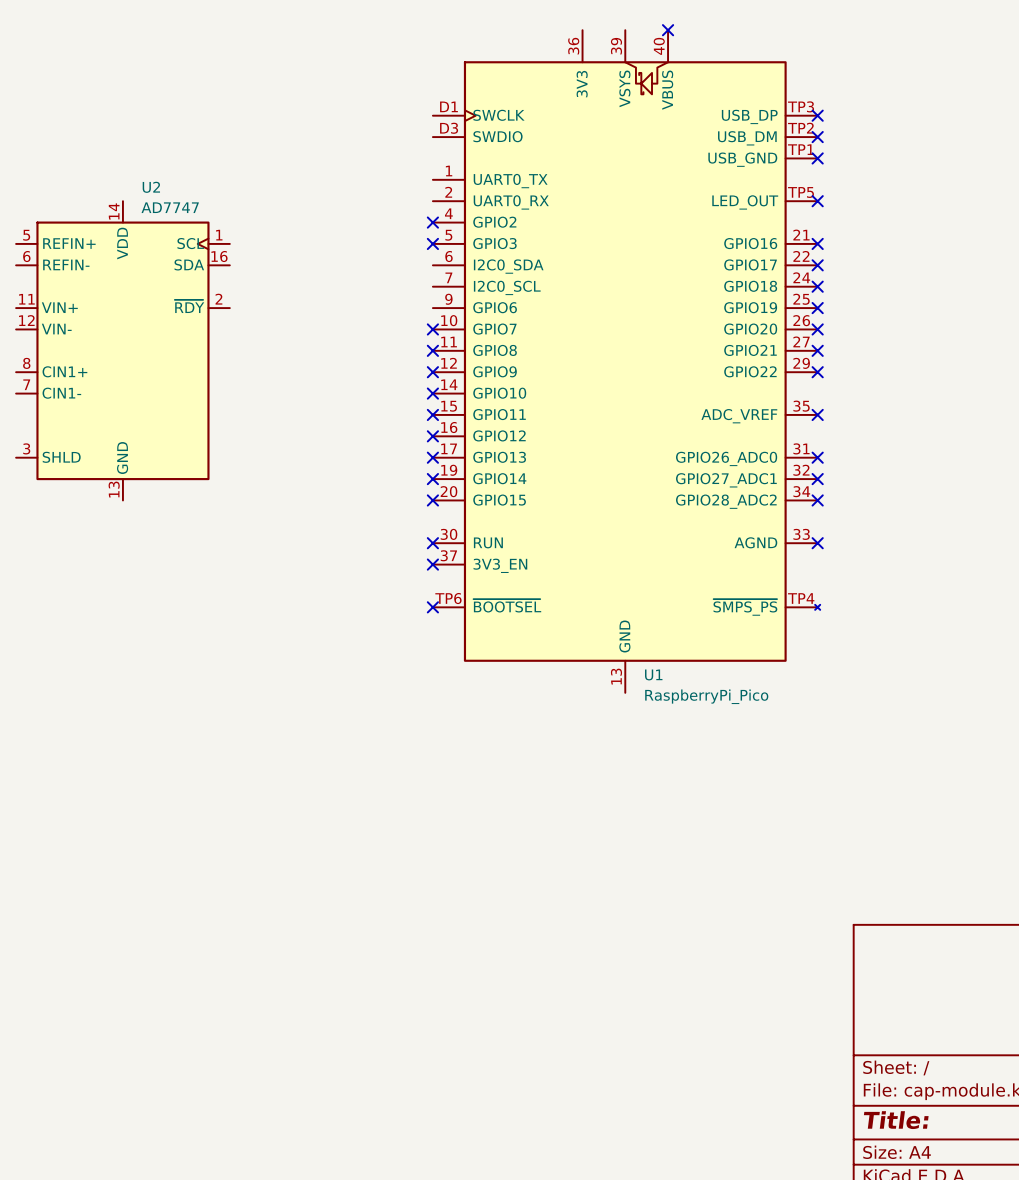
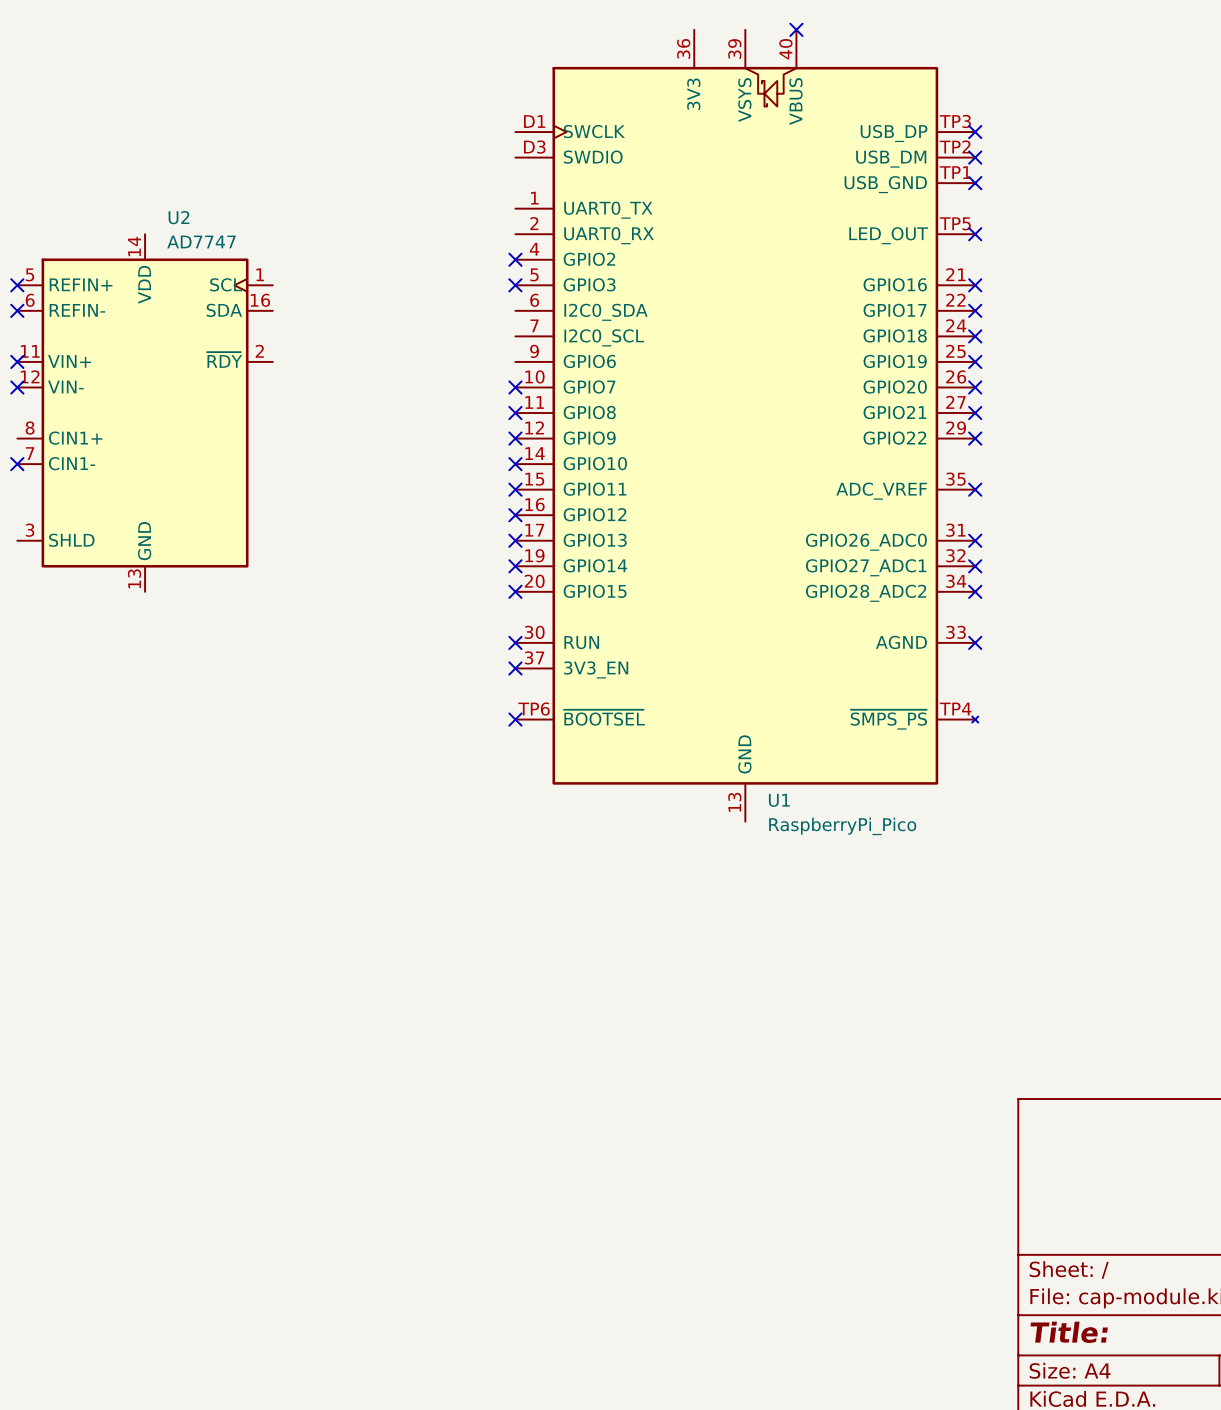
no-connect mark: none -> (17, 285)
no-connect mark: none -> (17, 310)
no-connect mark: none -> (17, 361)
no-connect mark: none -> (17, 387)
no-connect mark: none -> (17, 464)

